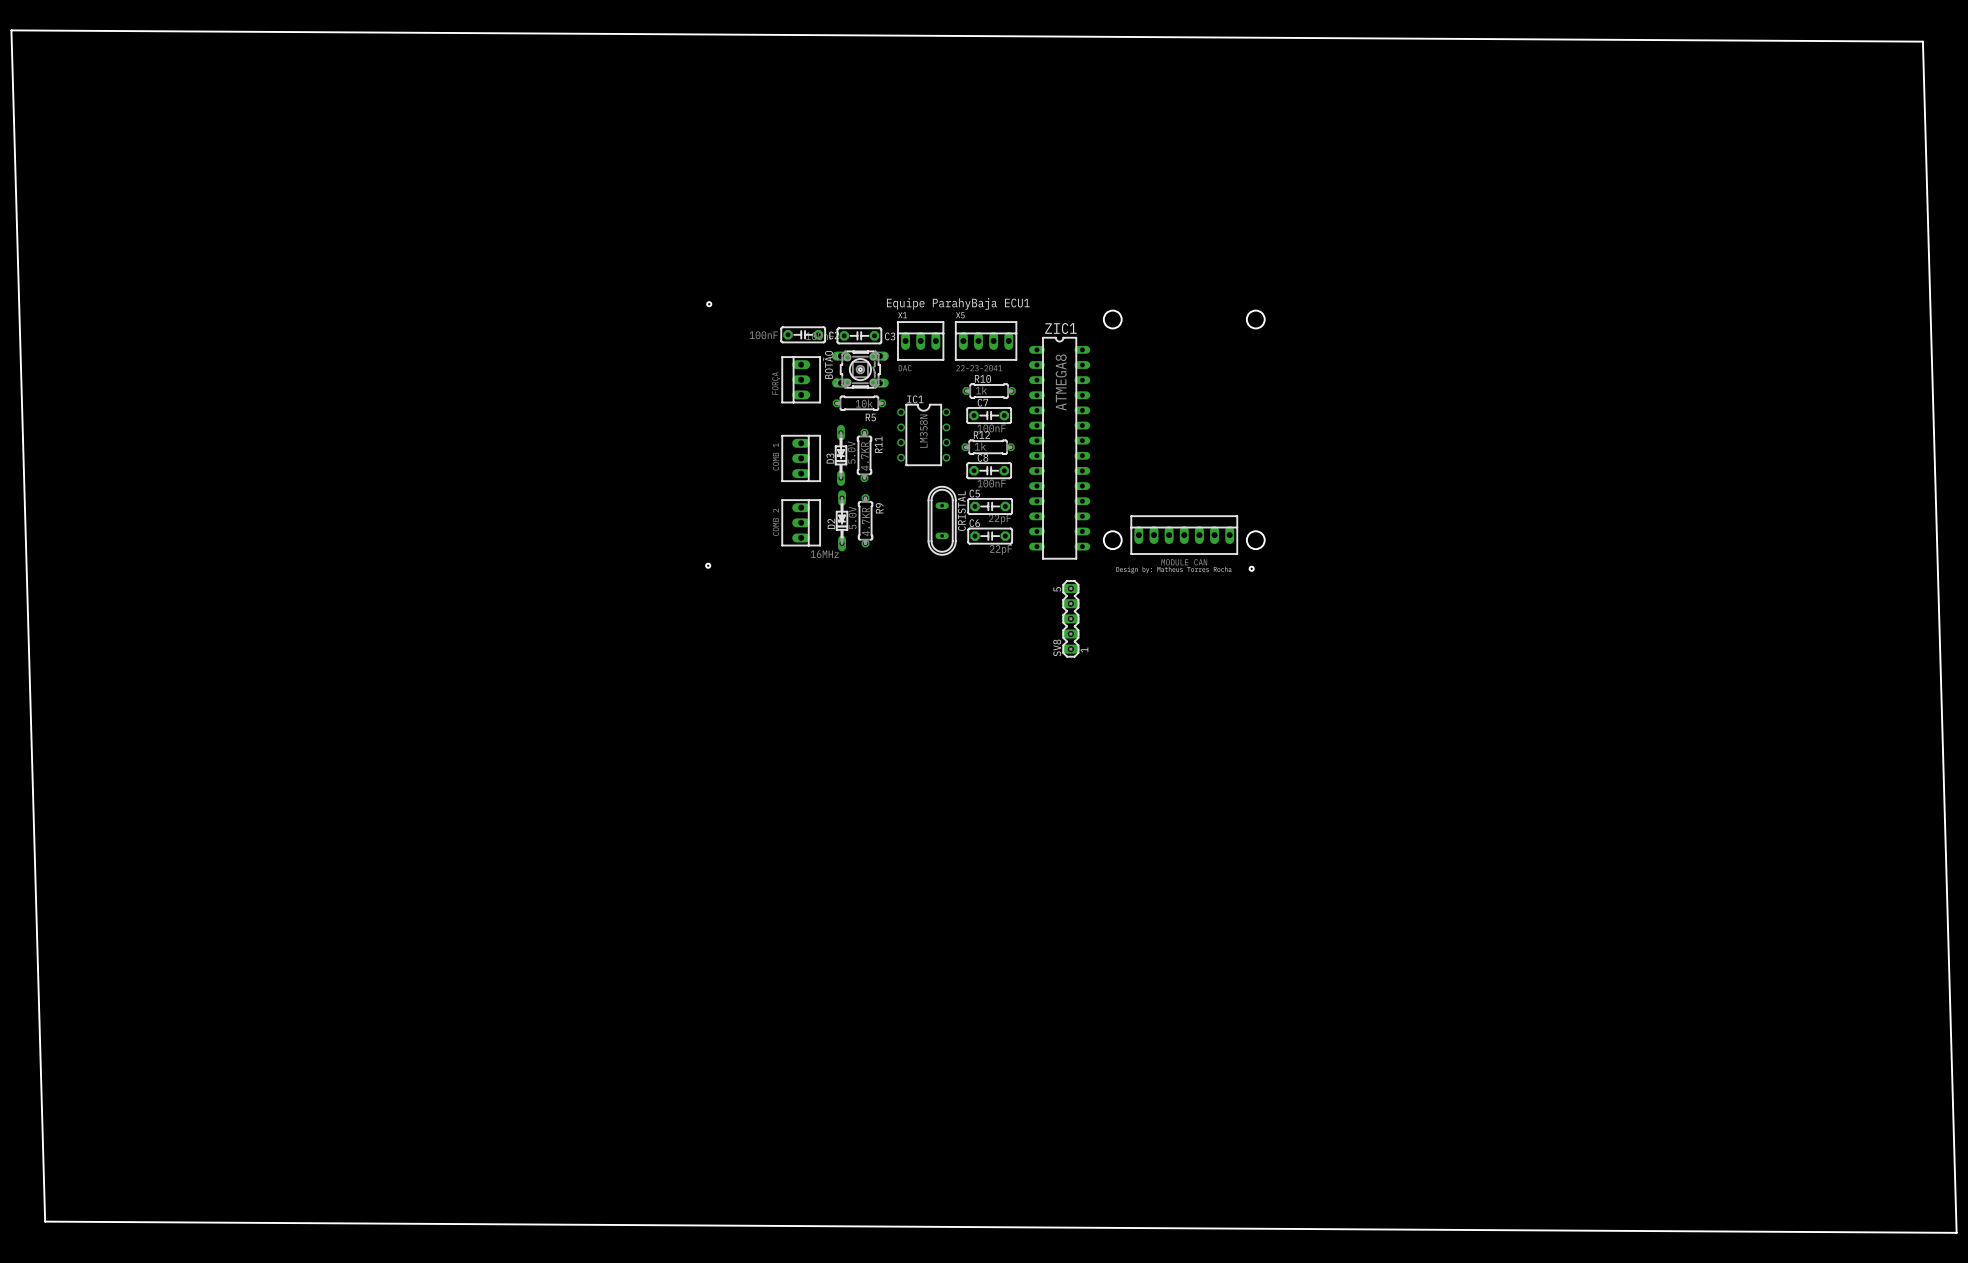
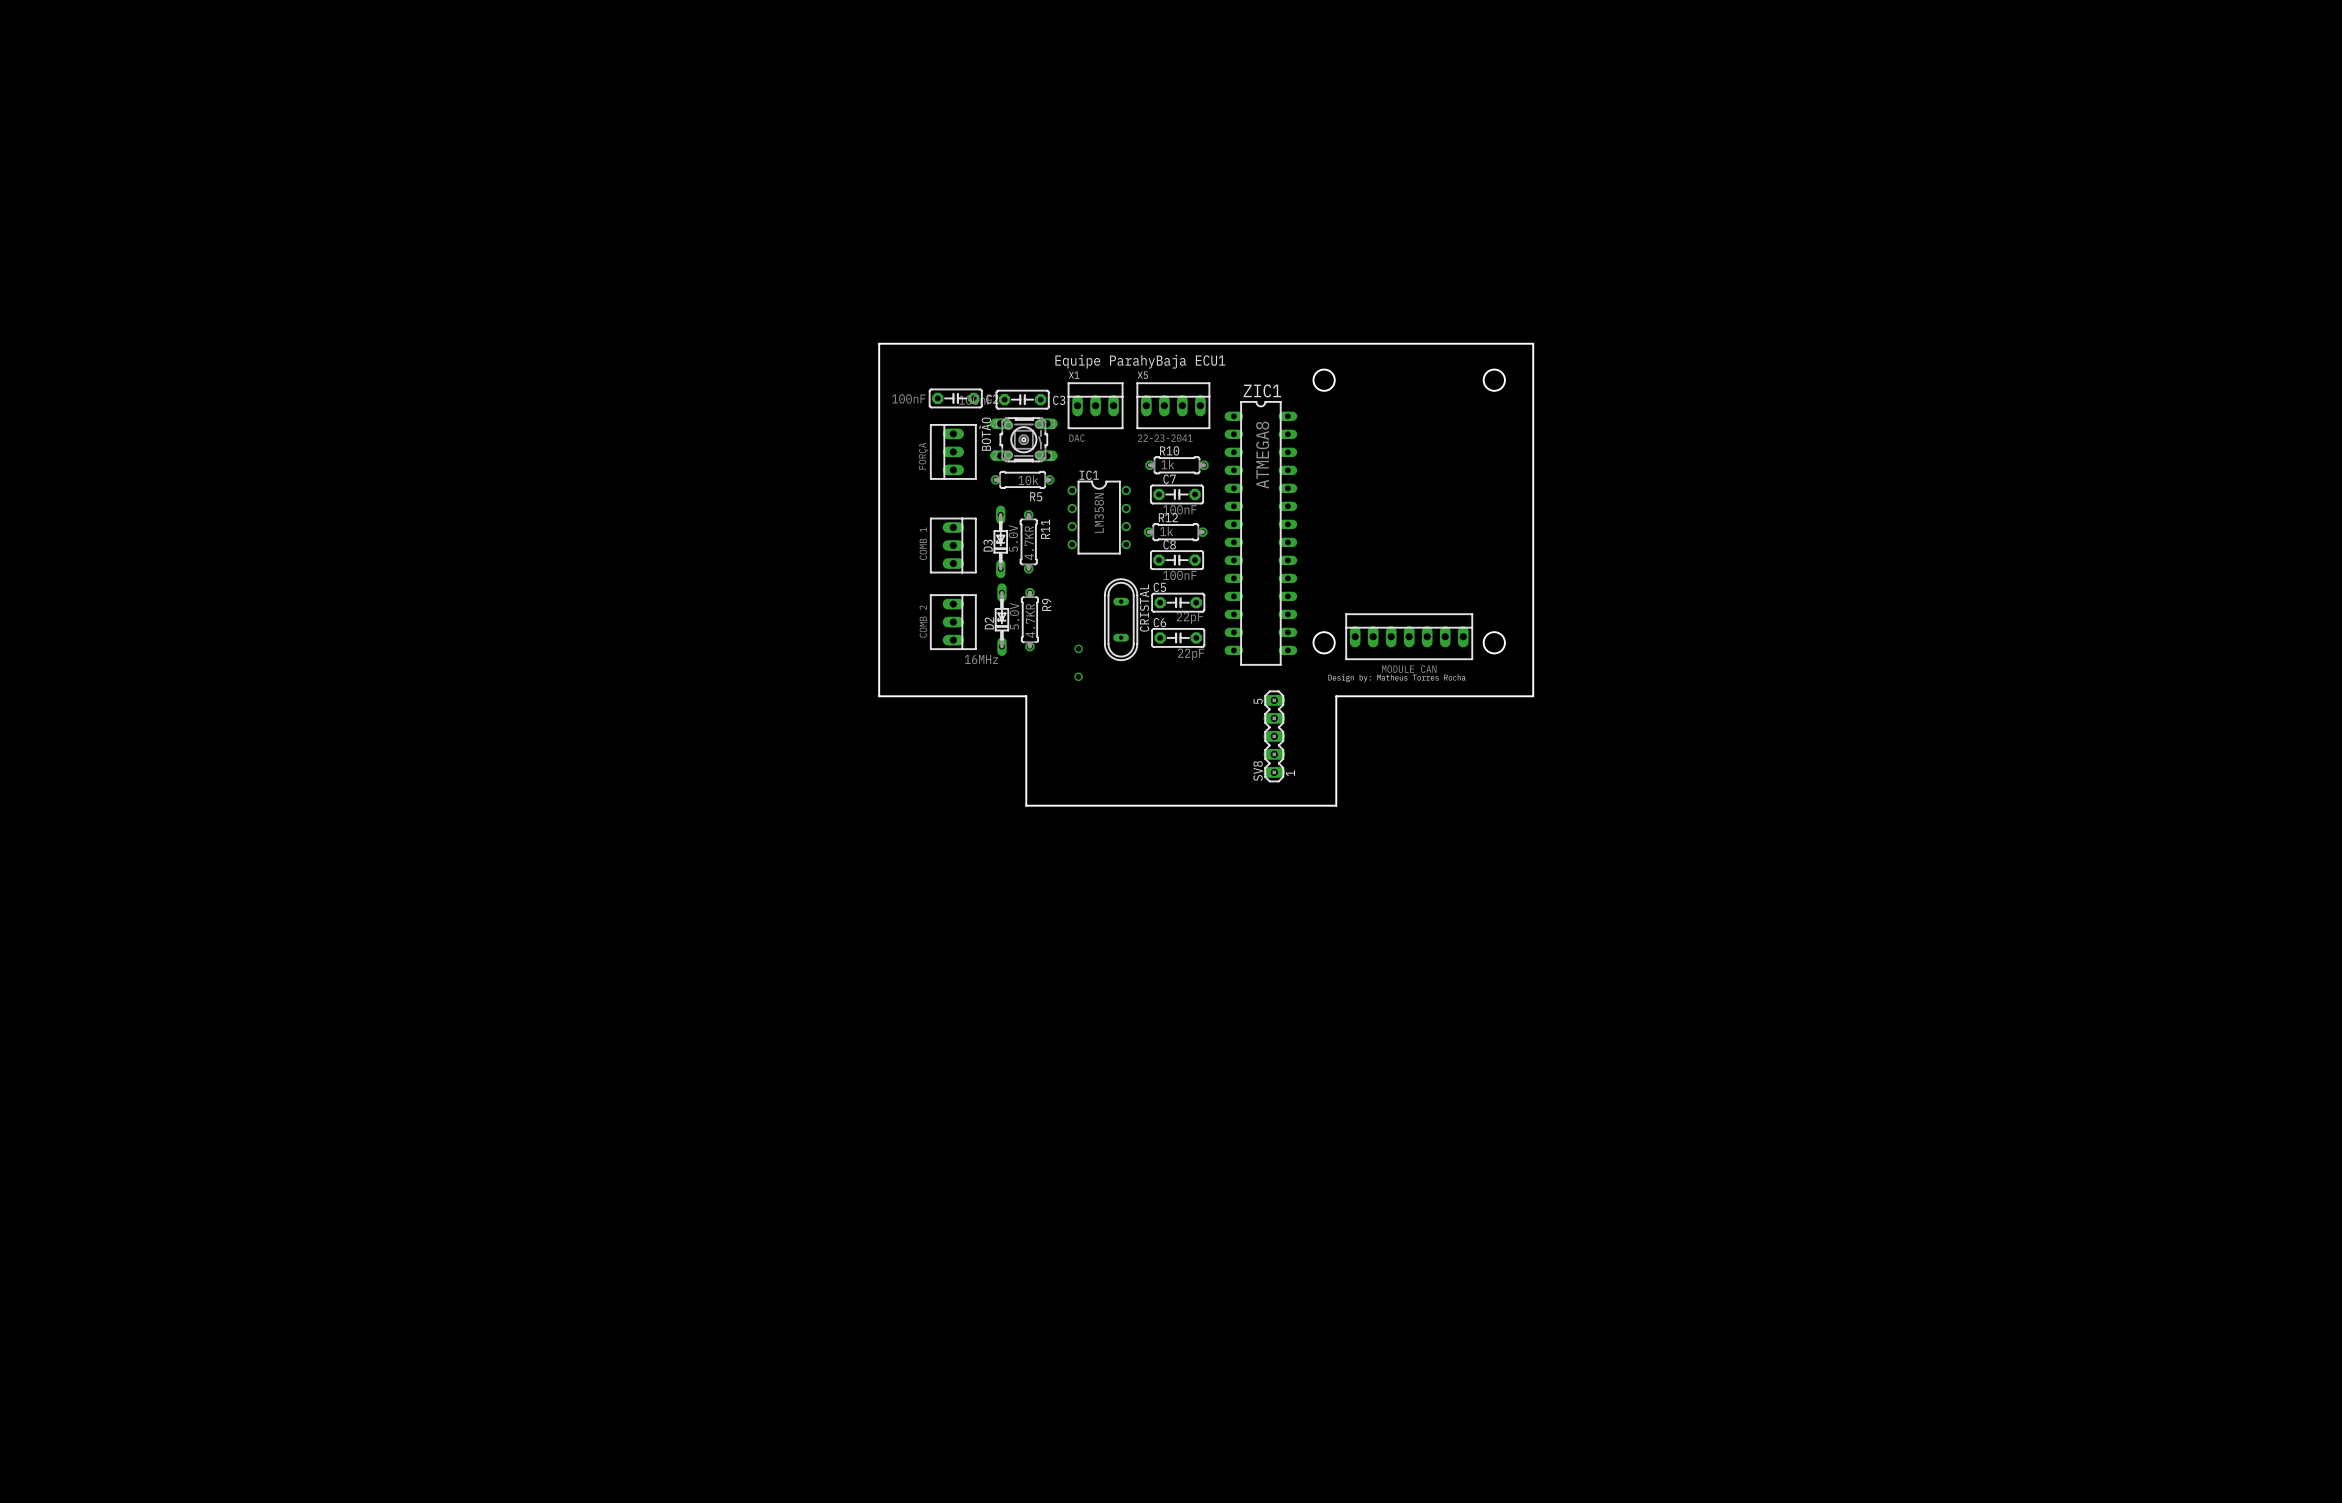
board edge: (11, 30) (1922, 41) (1956, 1232) (45, 1221) (11, 30) -> none
board edge: none -> (879, 343) (879, 696) (1026, 696) (1026, 805) (1336, 805) (1336, 696) (1533, 696) (1533, 343) (879, 343)
hole: (709, 304) -> none
via: none -> (1078, 648)
hole: (708, 565) -> none
via: none -> (1078, 676)
hole: (1251, 568) -> none

